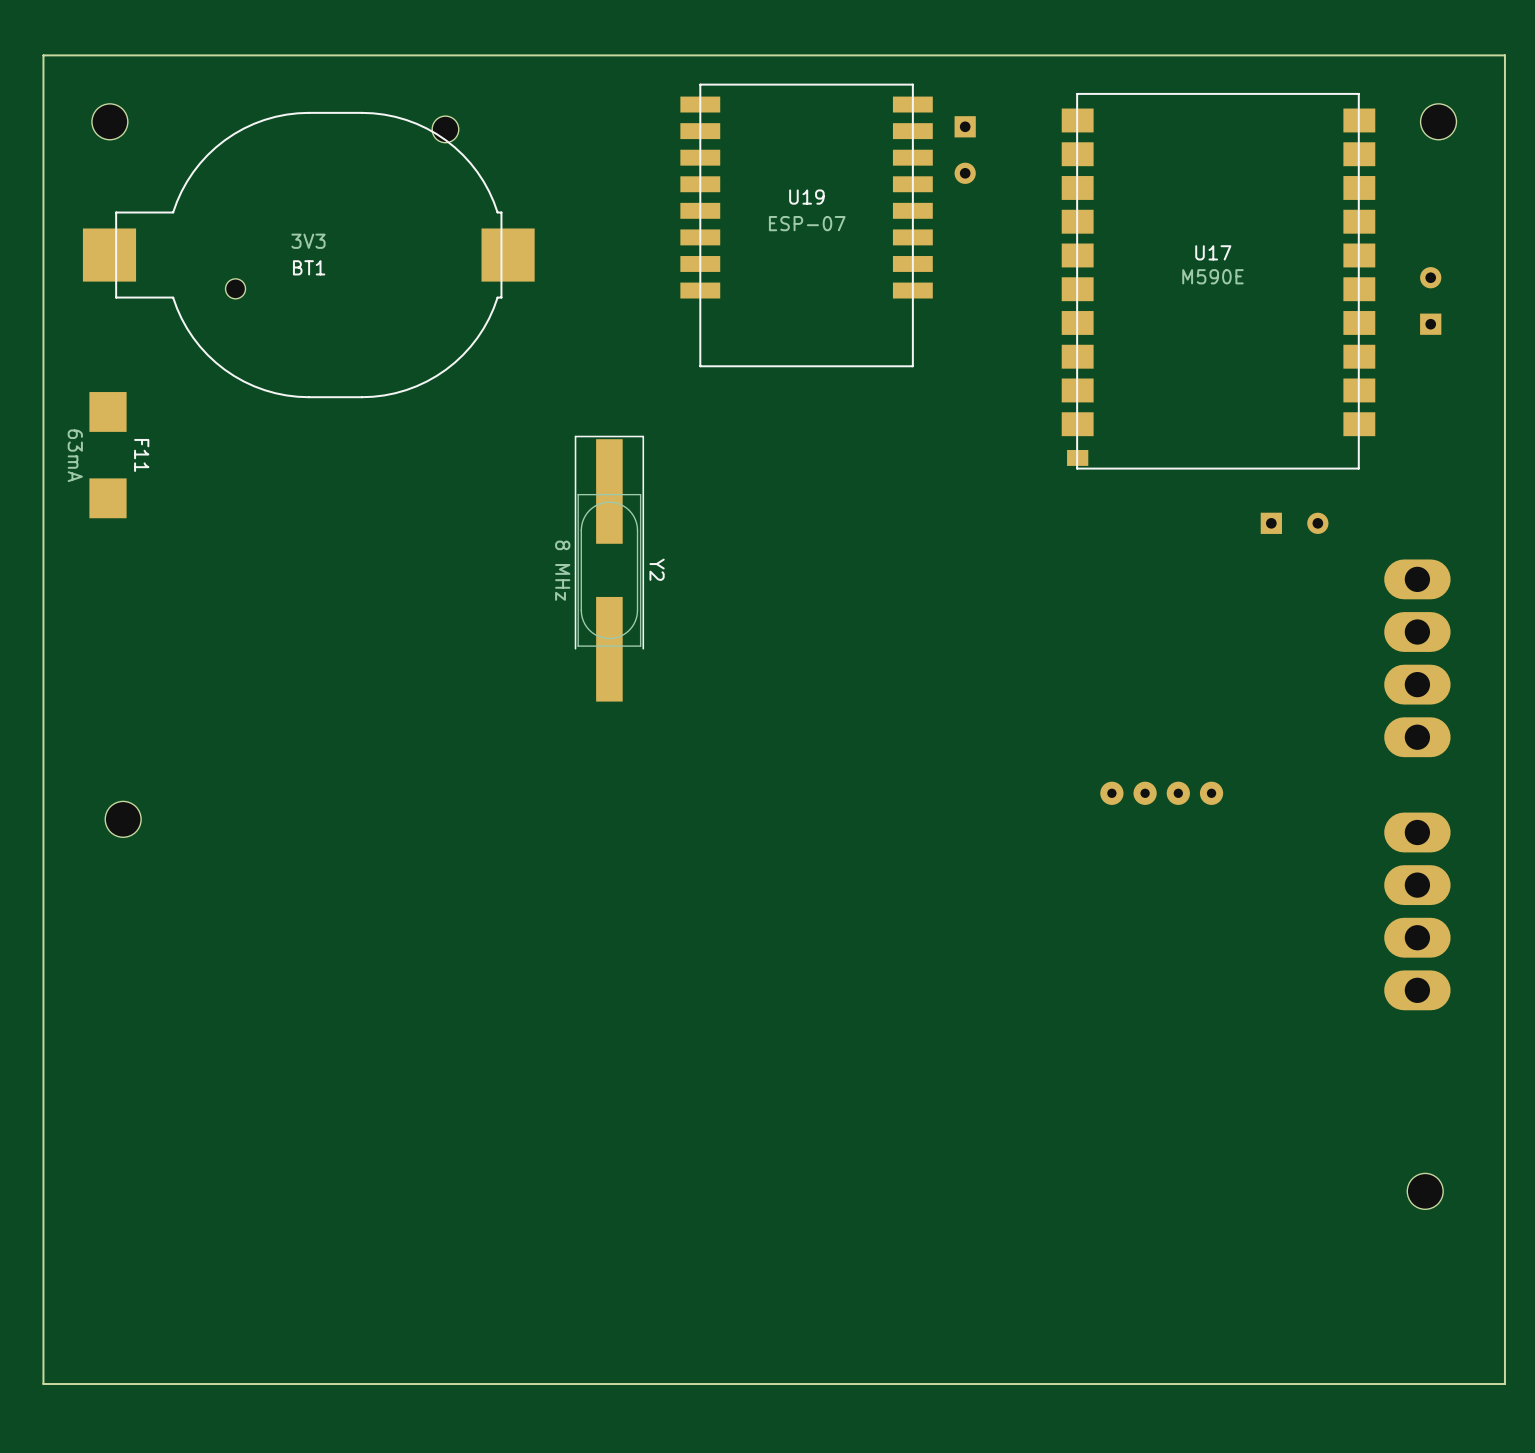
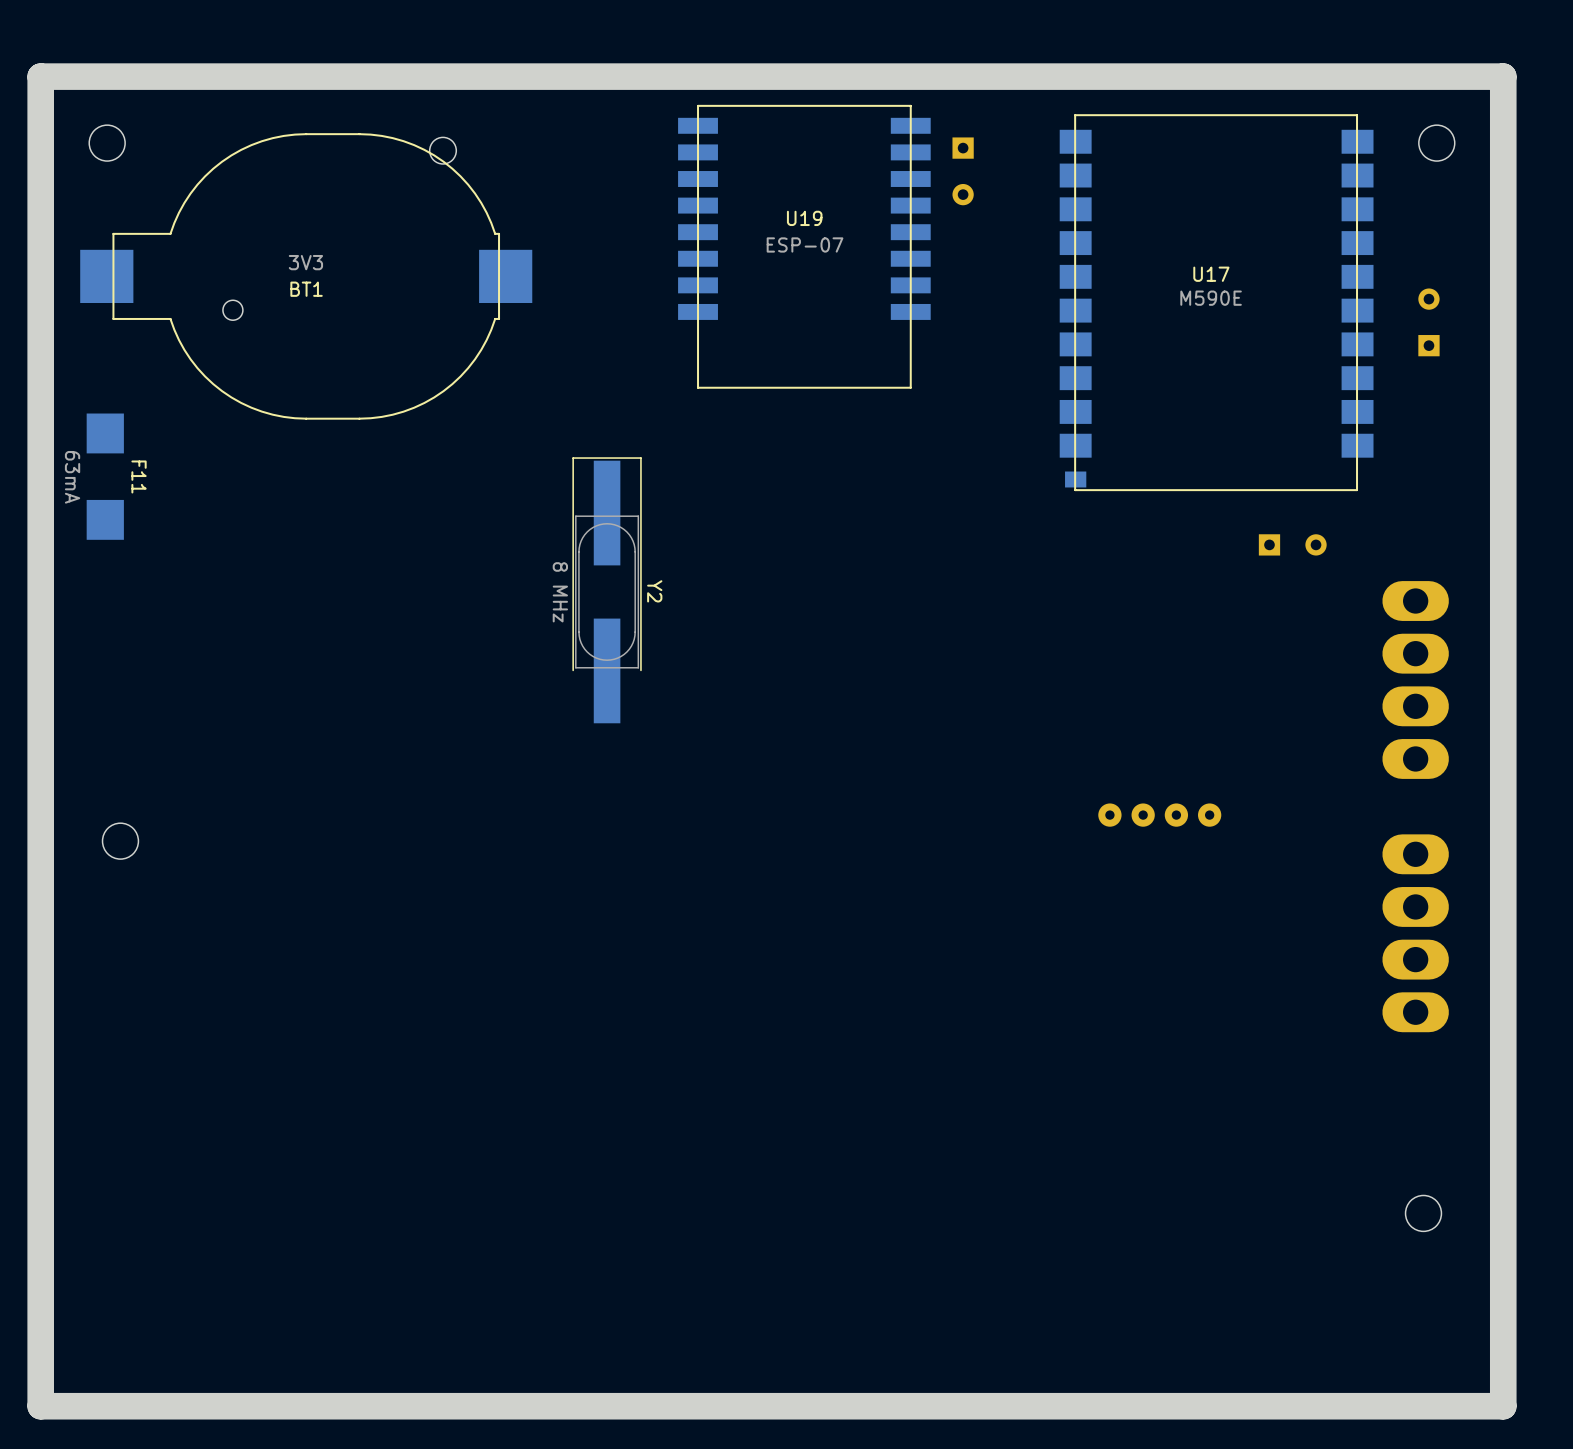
board edge width: thin (1504, 55) (1504, 1384) (43, 1384) (43, 55) (1504, 55) -> thick (1503, 76) (1503, 1406) (40, 1406) (40, 76) (1503, 76)

